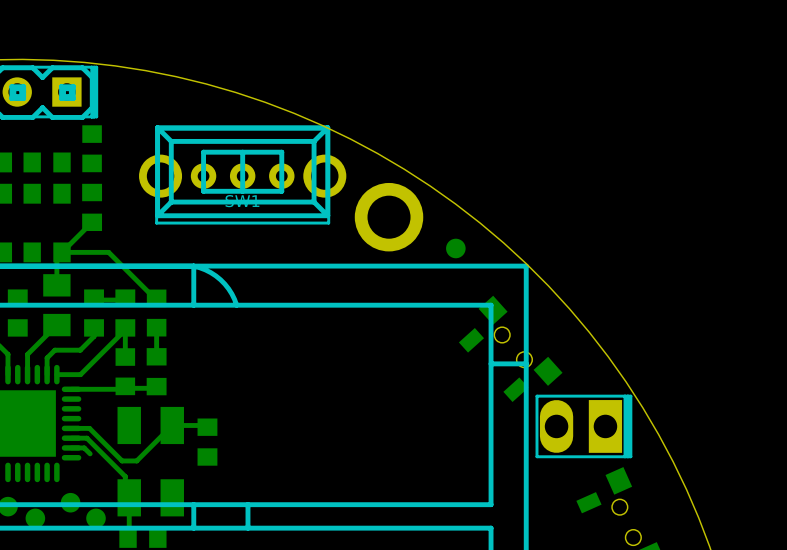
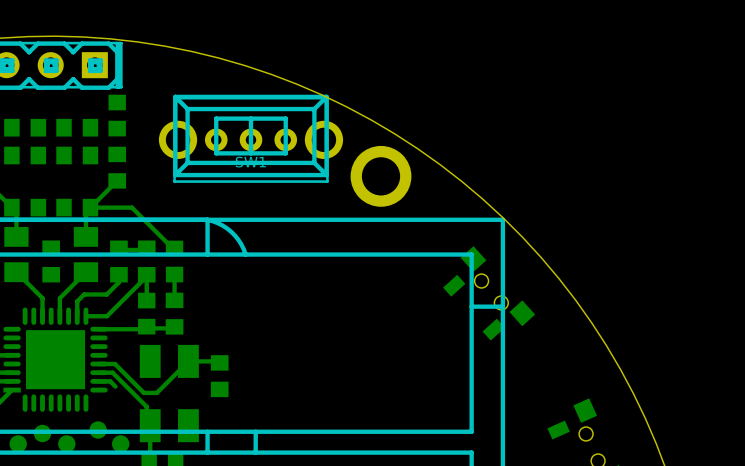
part: (455, 248) -> none
part: (583, 426) -> none

